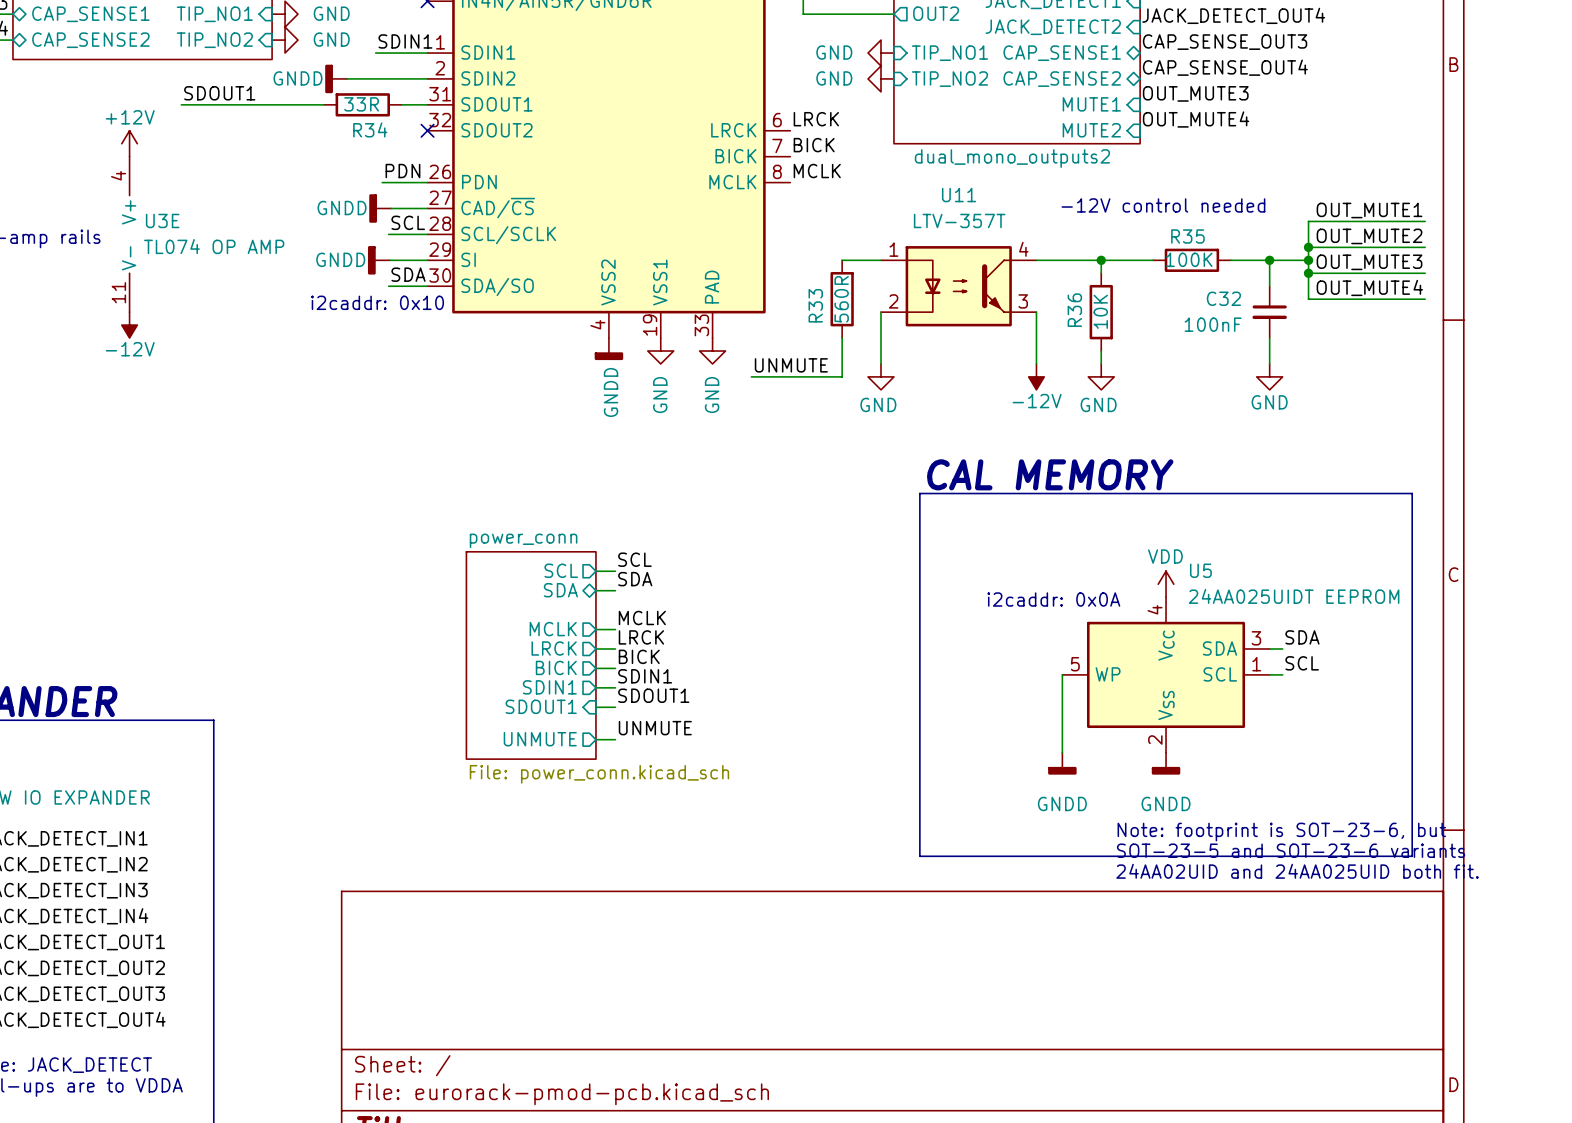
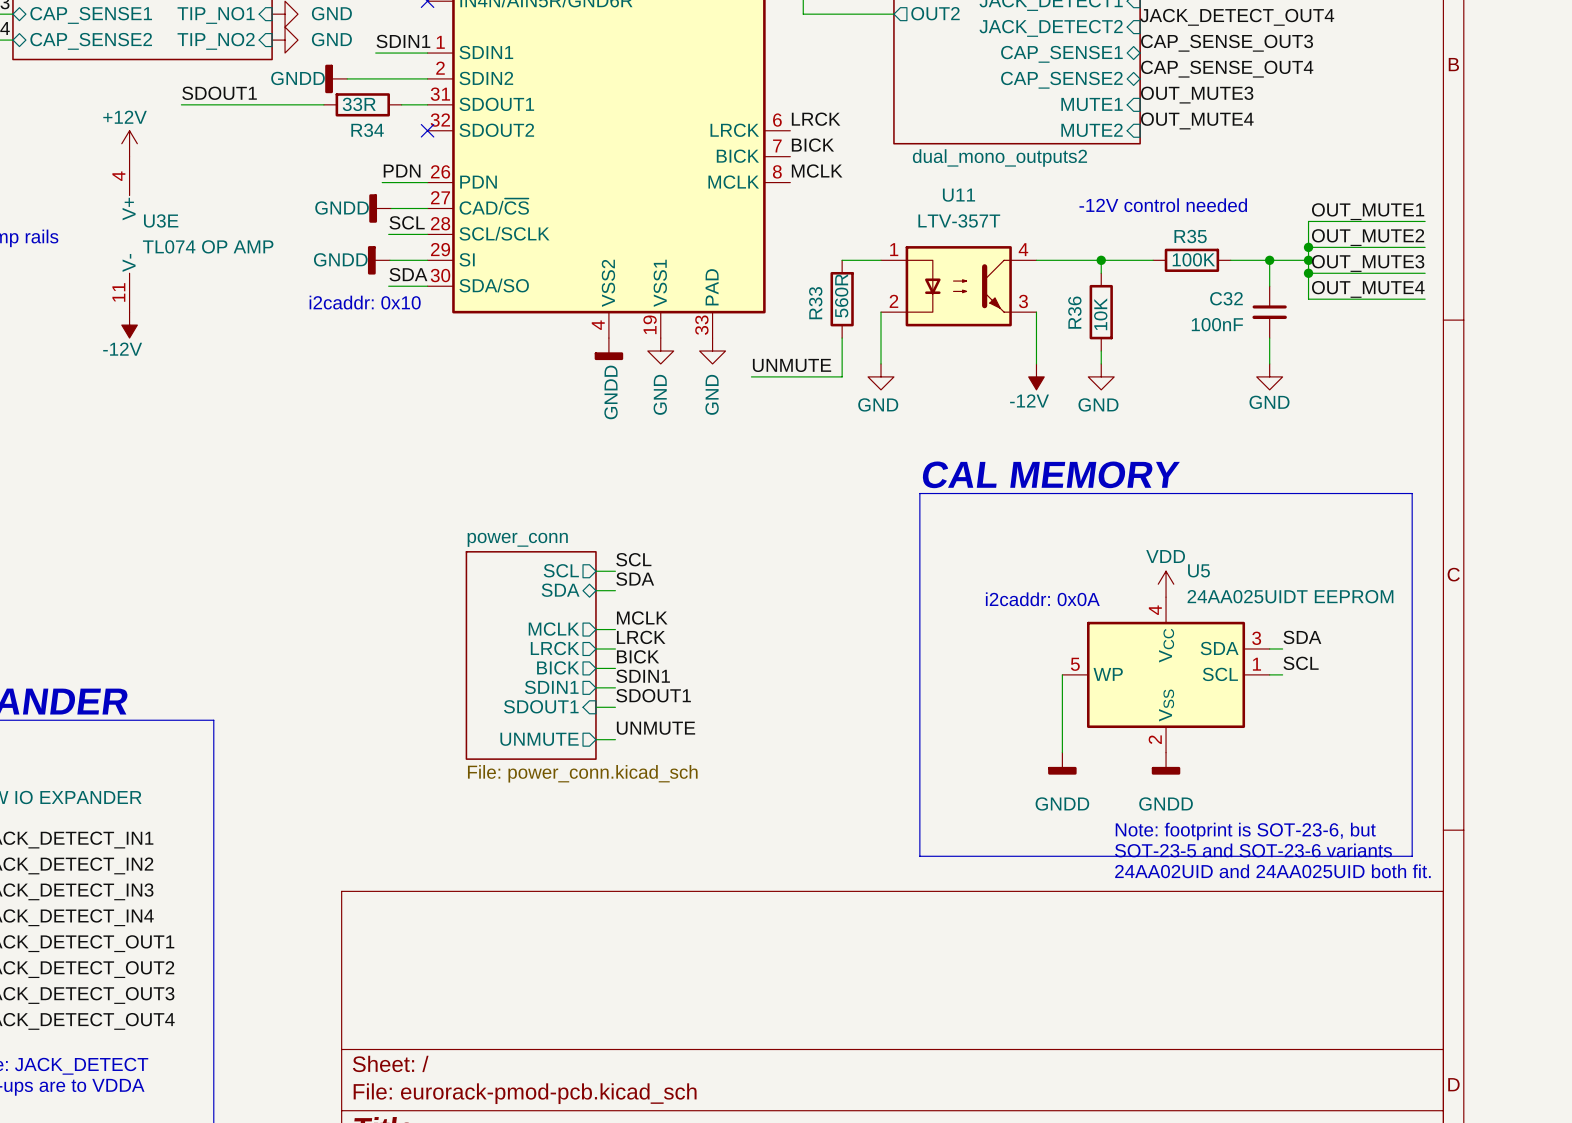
power symbol: GND (881, 53) -> none
sheet pin: TIP_NO1 (949, 53) -> none
power symbol: GND (881, 78) -> none
sheet pin: TIP_NO2 (949, 79) -> none

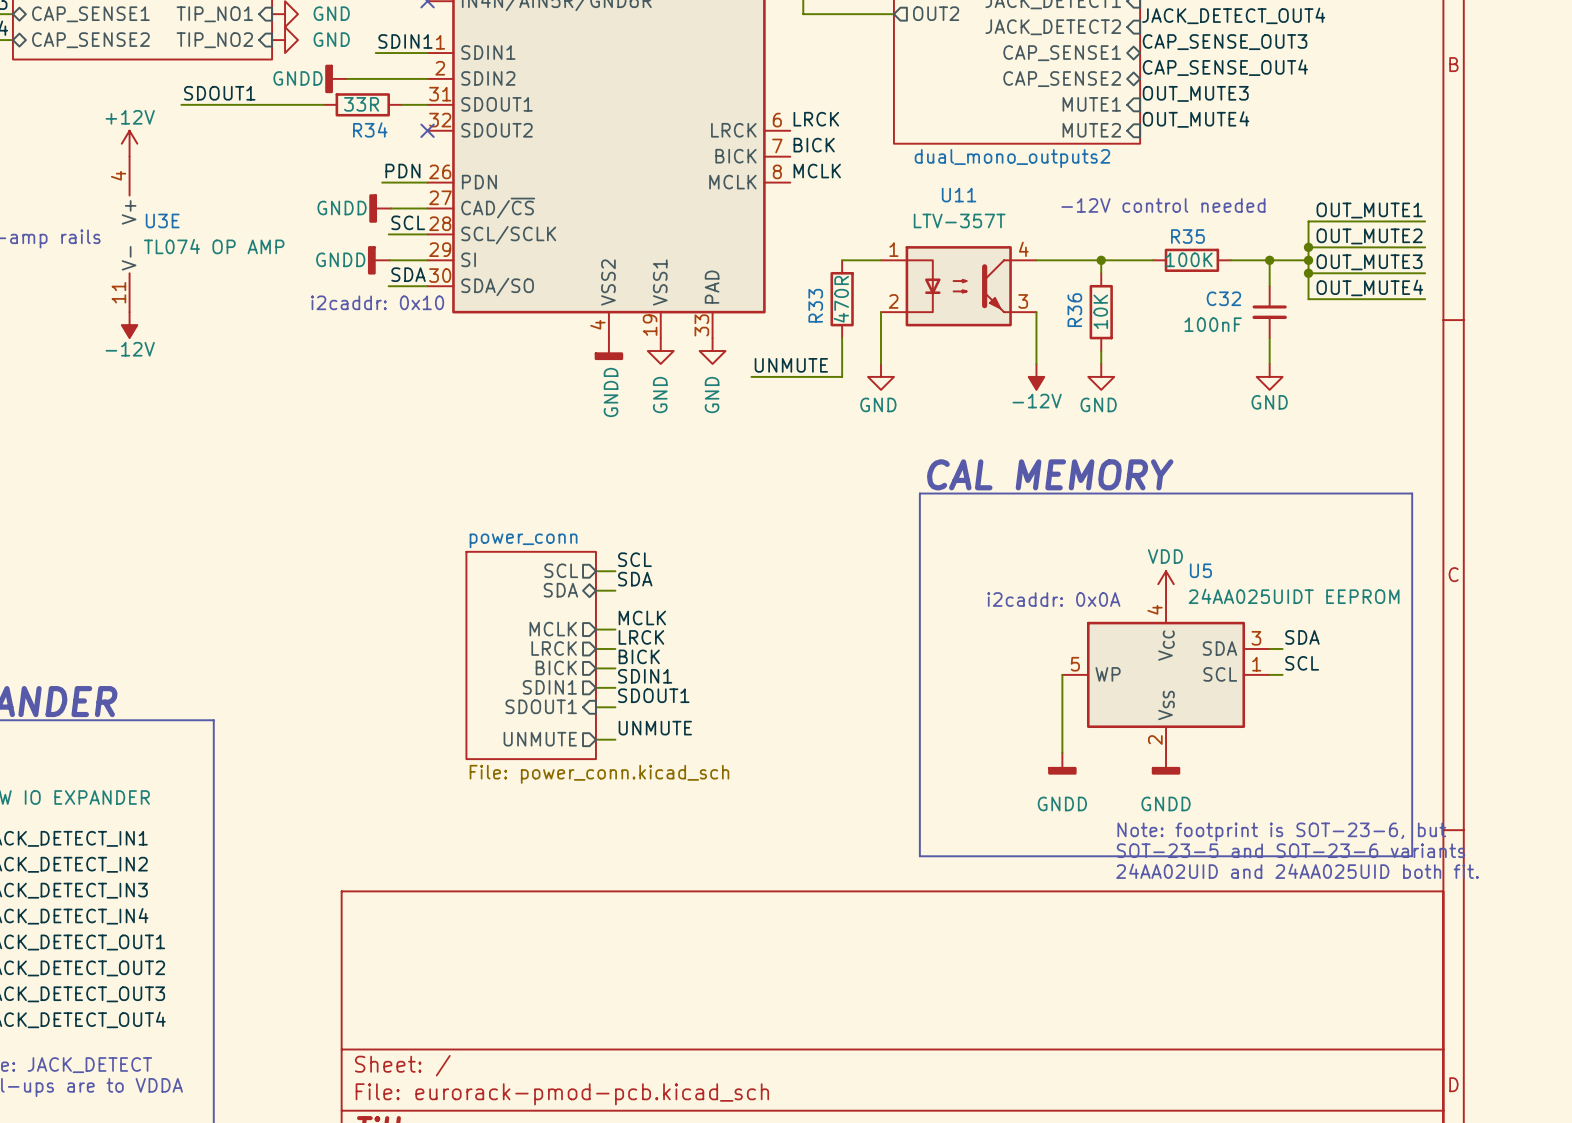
R33 value: 560R (841, 295) -> 470R (841, 299)

